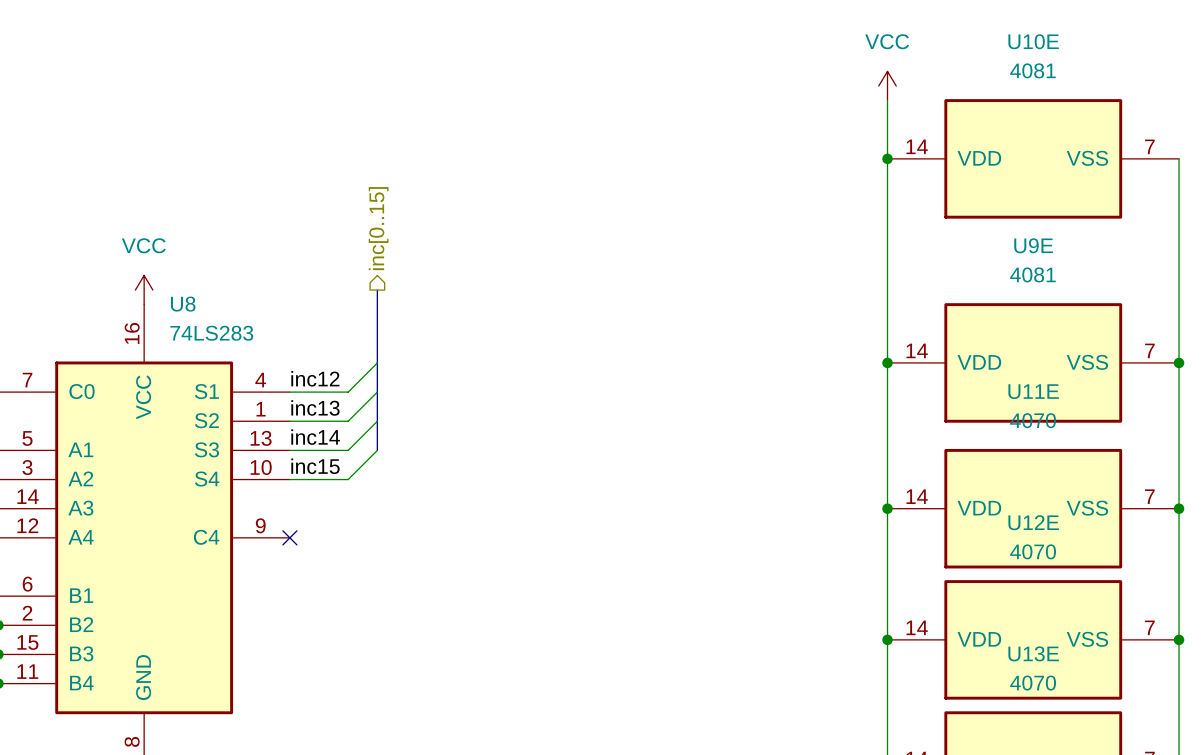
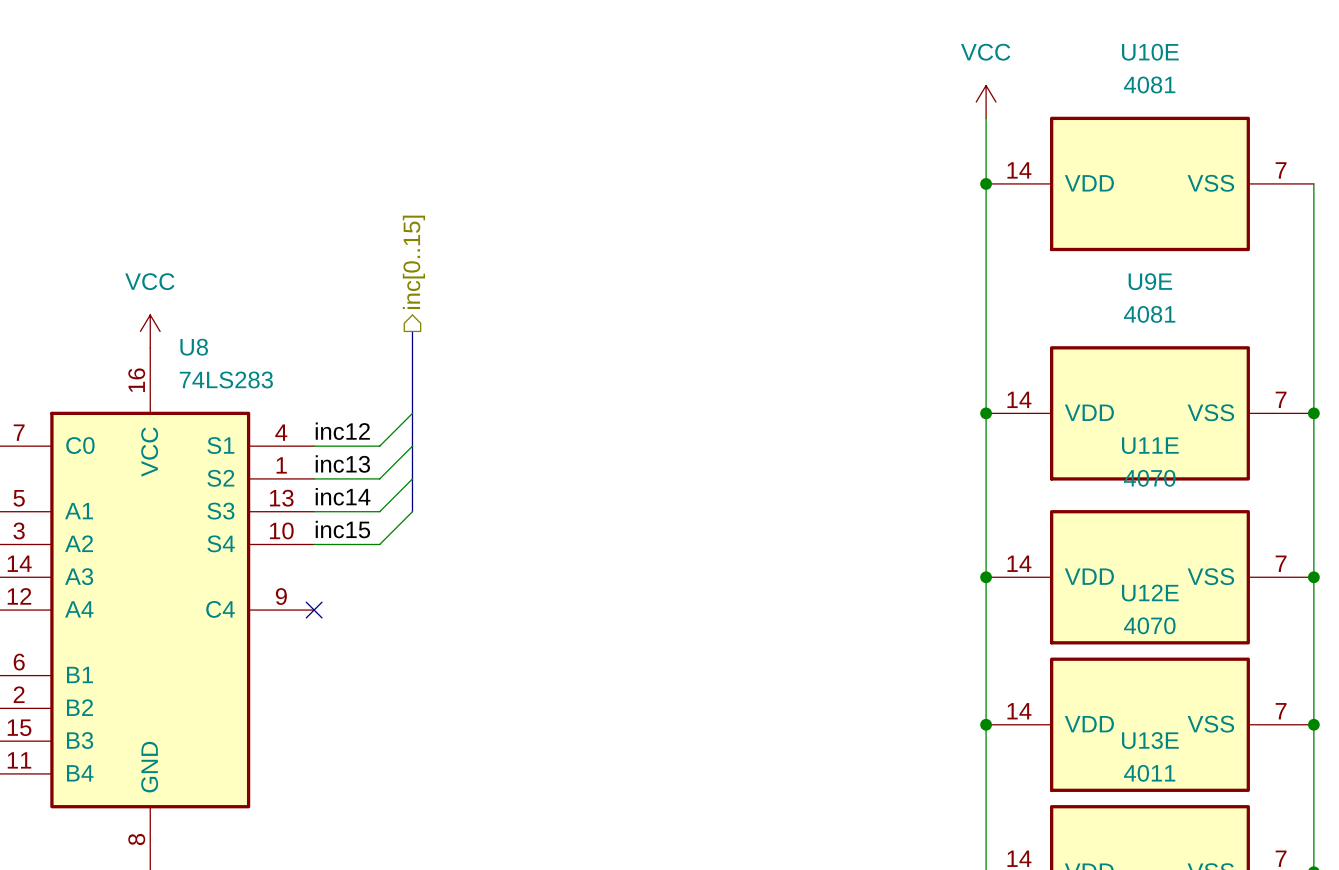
U13E value: 4070 (1033, 683) -> 4011 (1149, 773)

